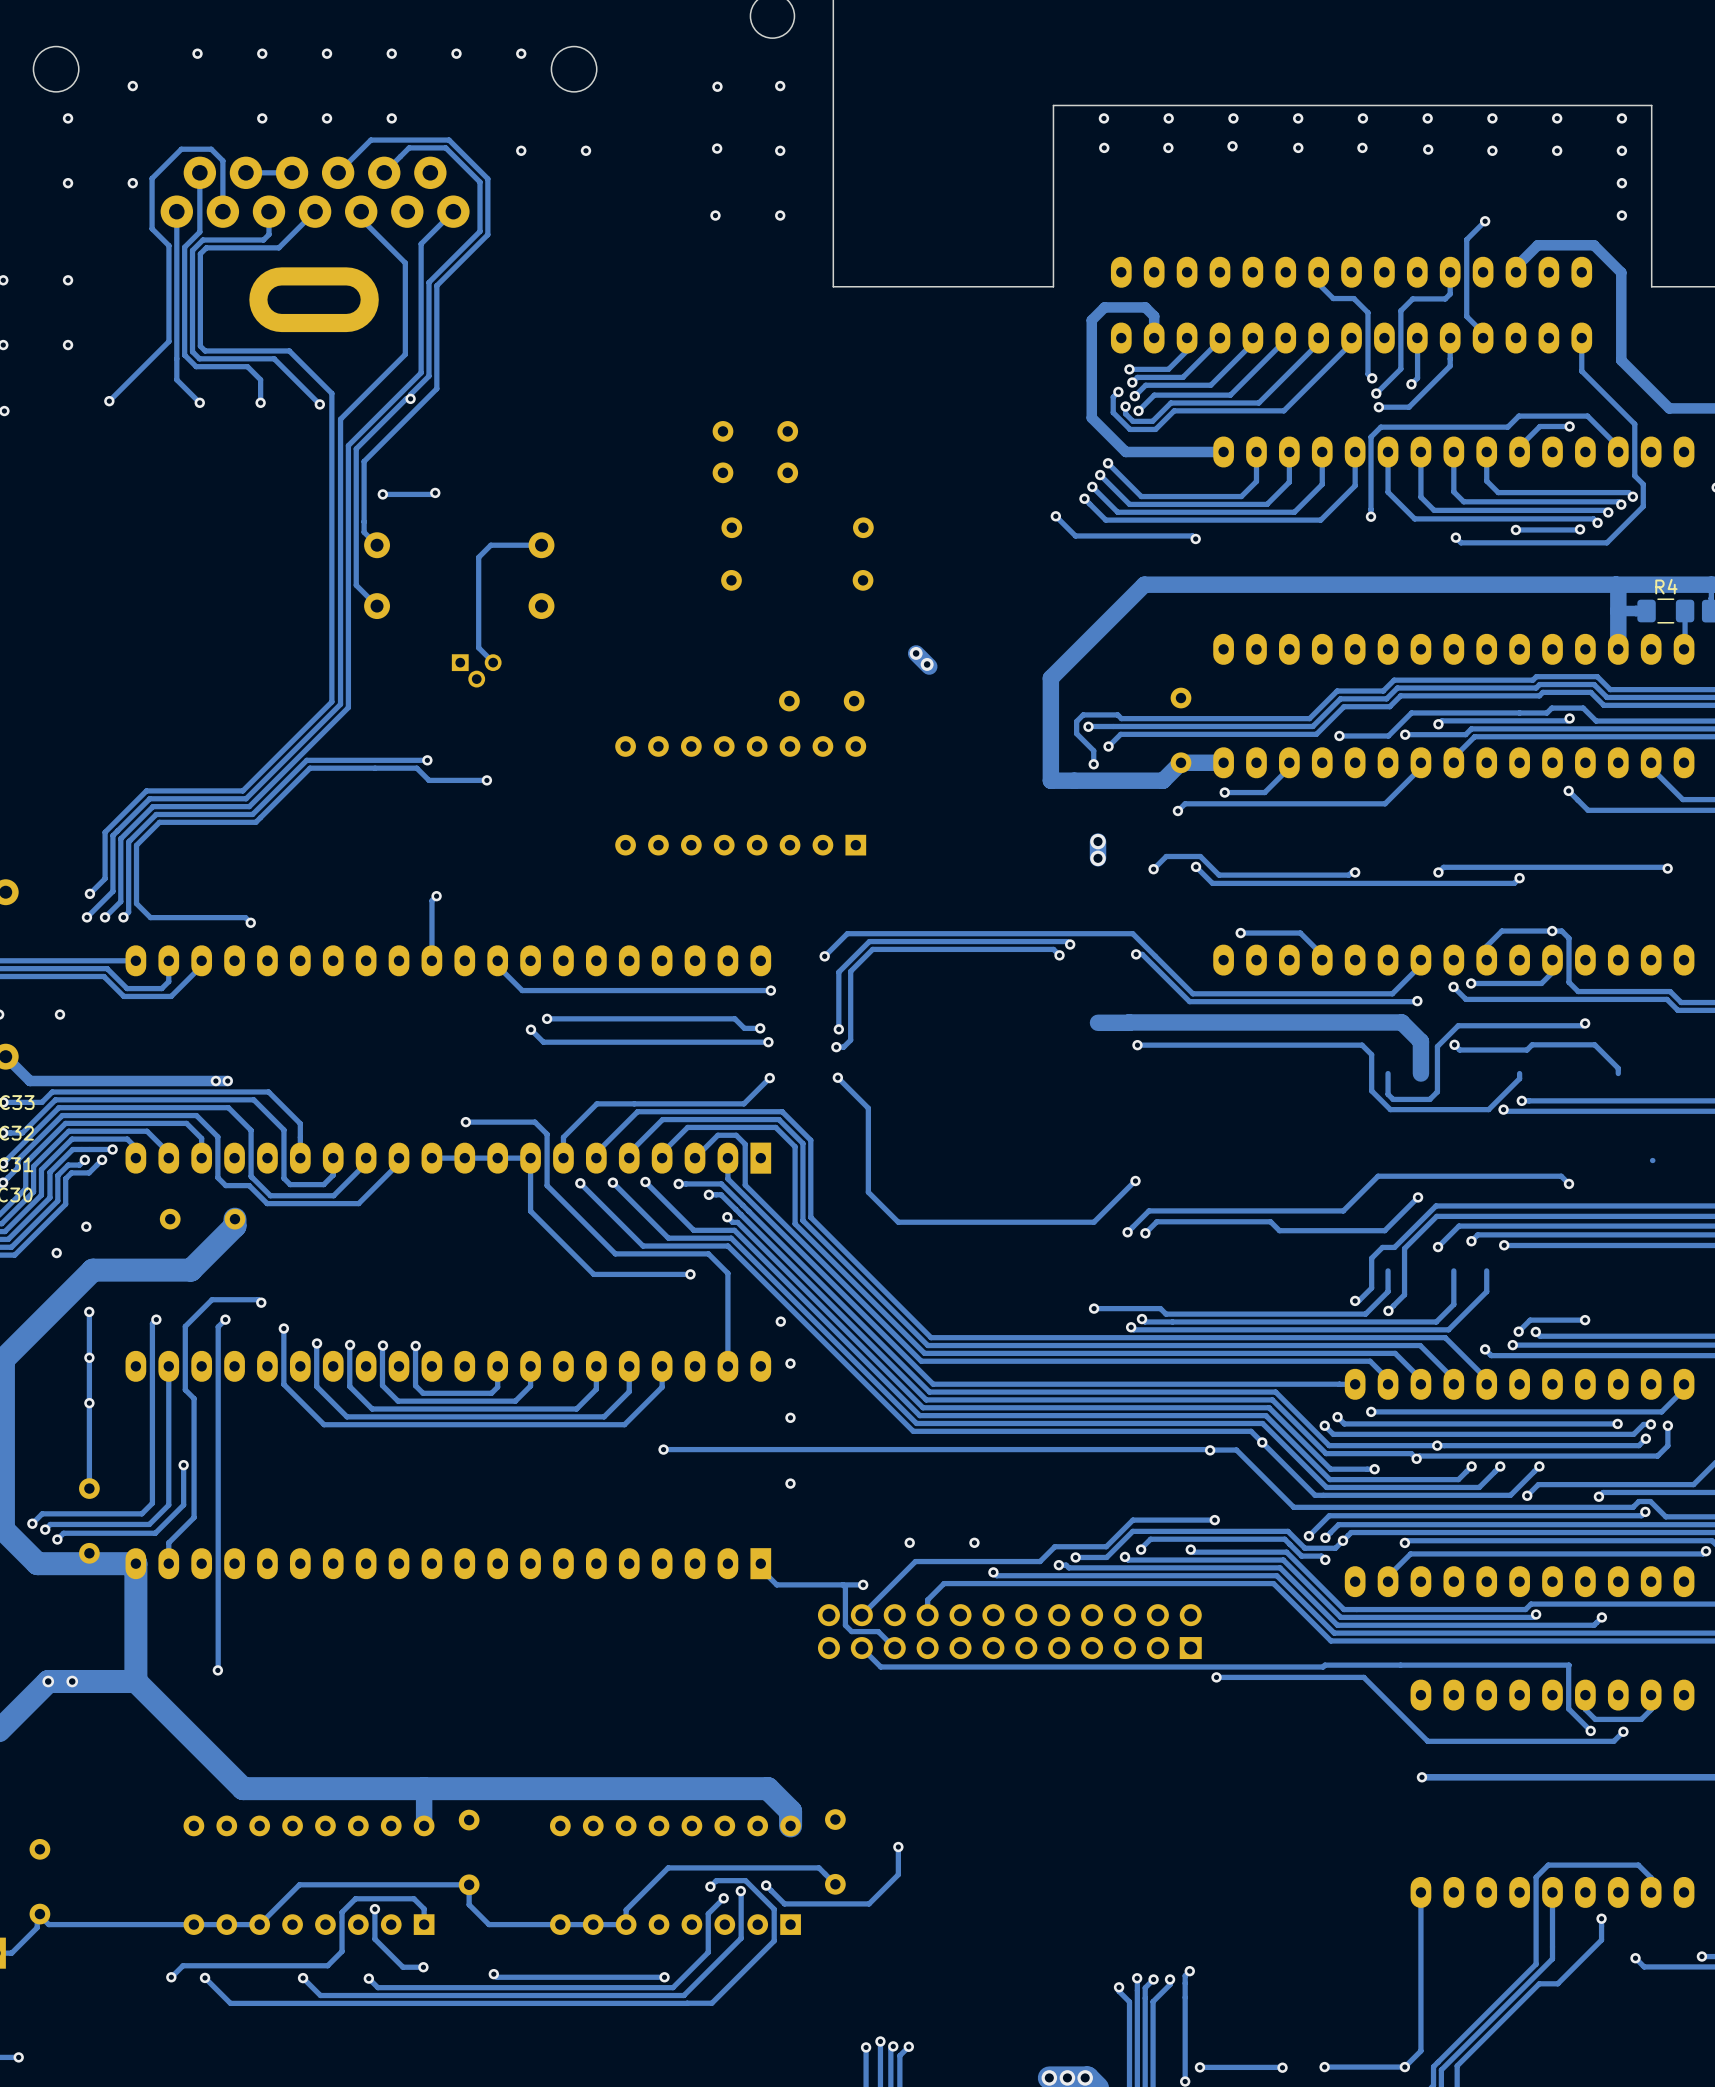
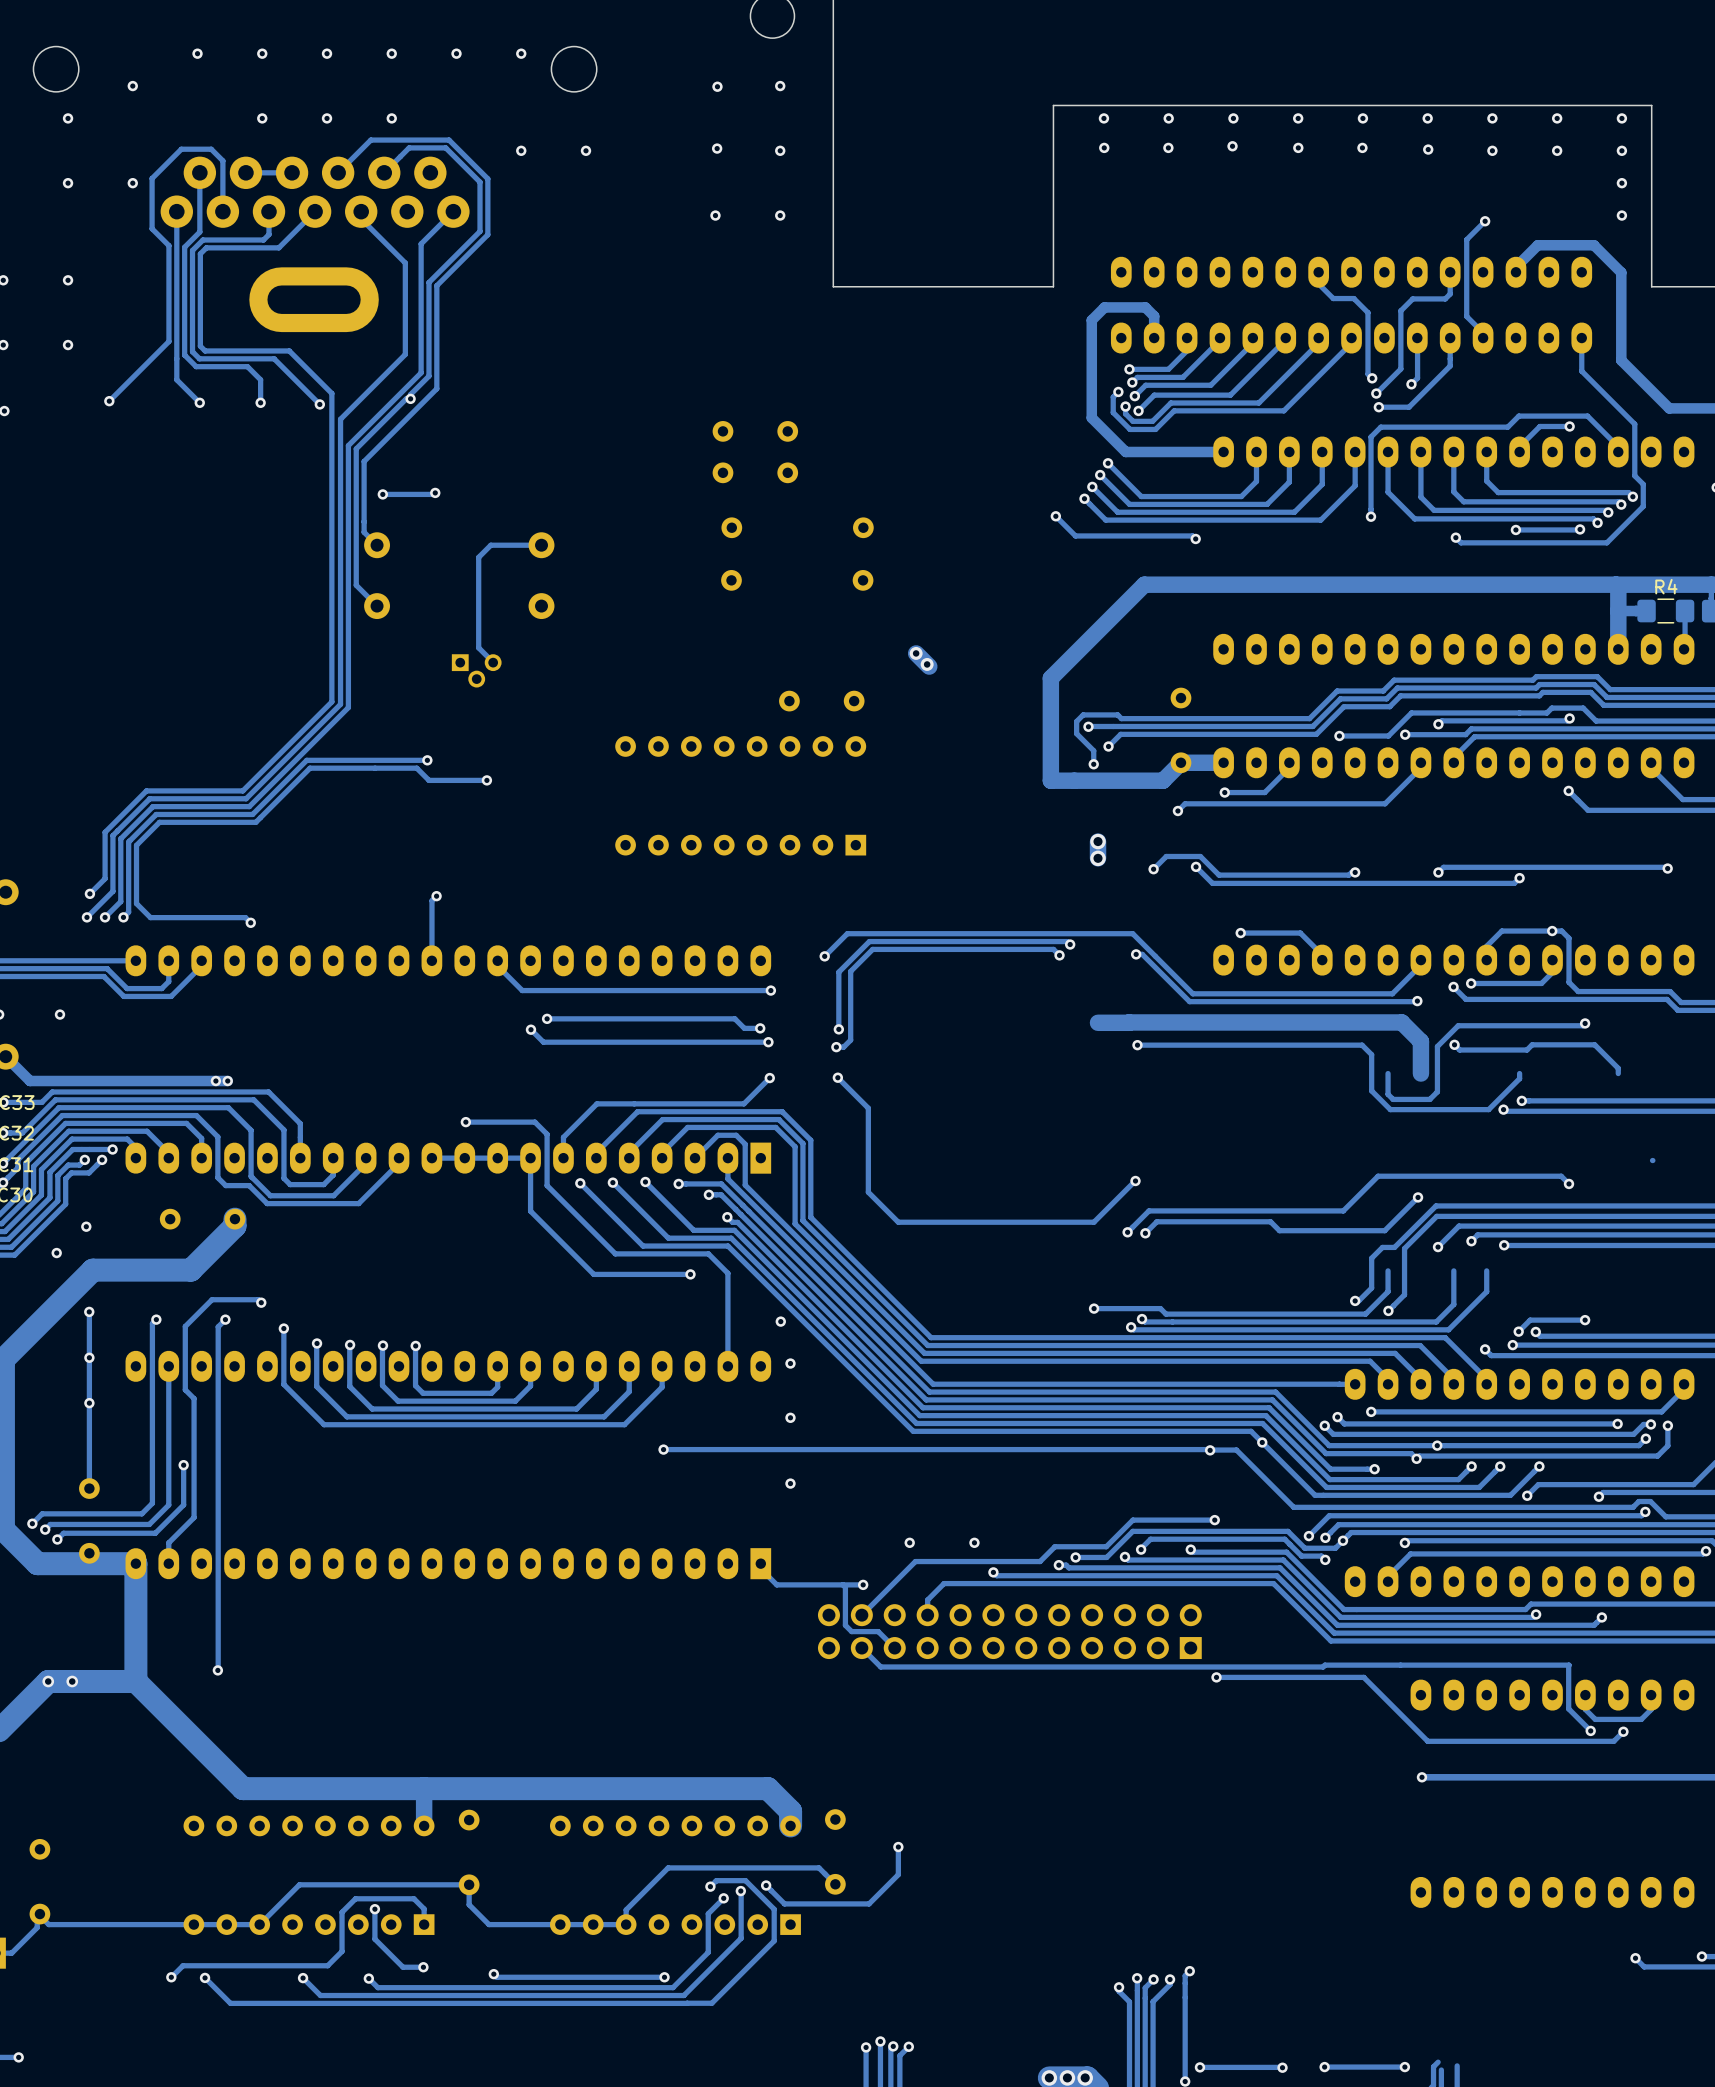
track: (1420, 1892) (1420, 2051) (1404, 2067) -> none
track: (1552, 1892) (1552, 1958) (1441, 2070) -> none
track: (1651, 1892) (1651, 1877) (1638, 1865) (1548, 1865) (1536, 1877) (1536, 1964) (1438, 2062) -> none
track: (1601, 1918) (1601, 1940) (1557, 1983) (1539, 1983) (1457, 2065) -> none
via: (1601, 1918) -> none

